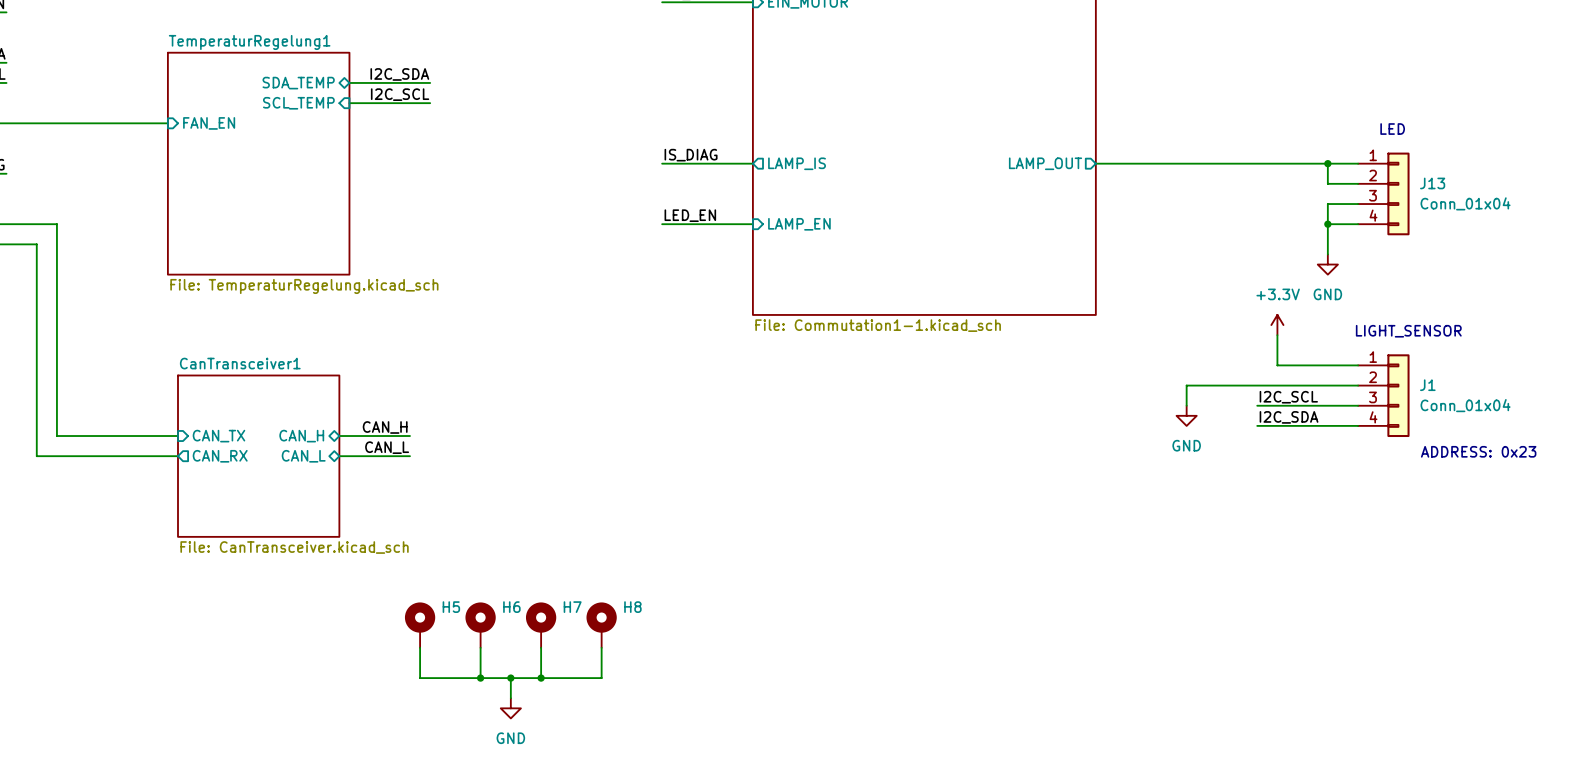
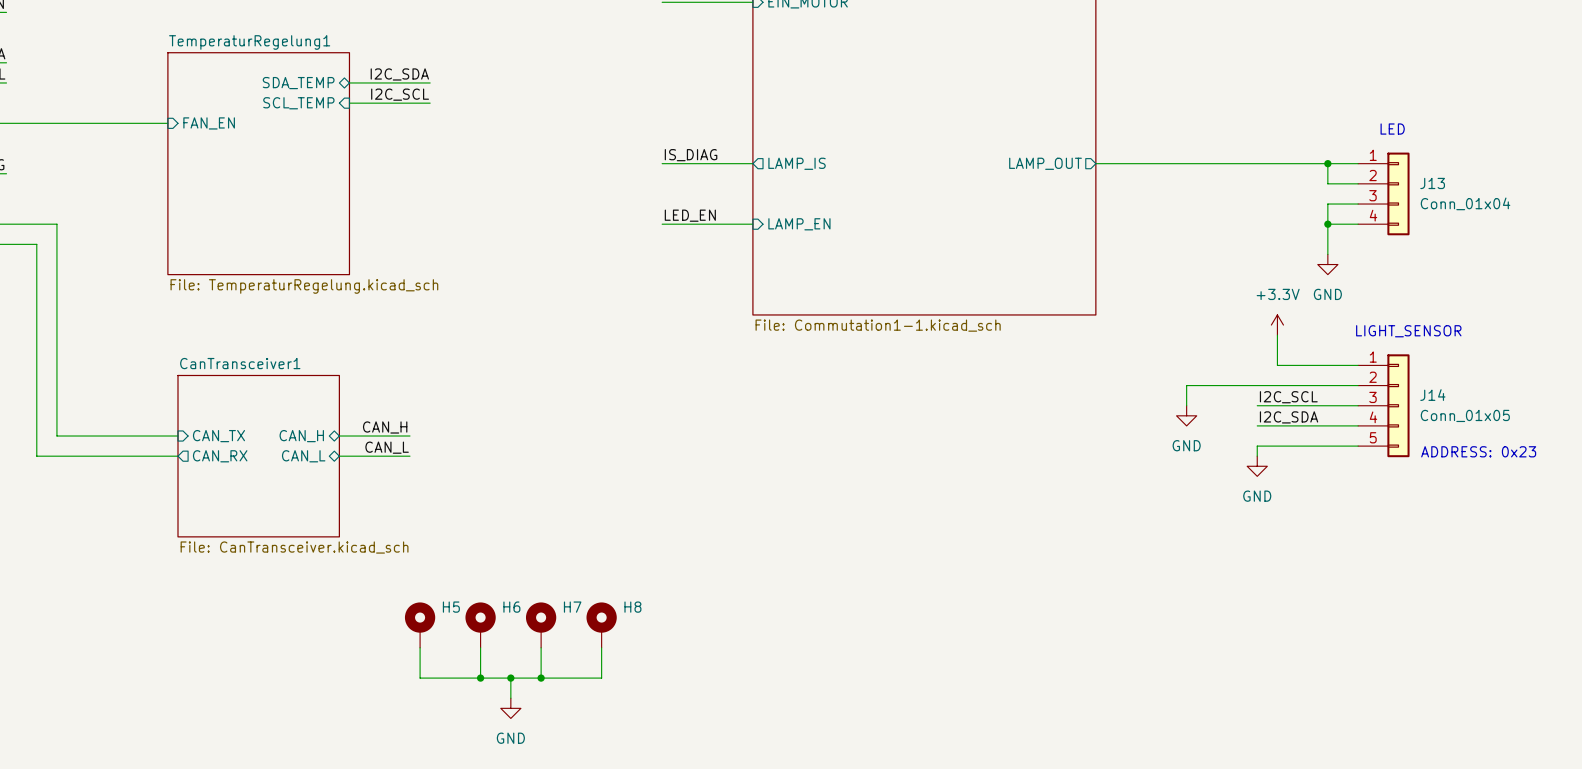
J1: Conn_01x04 (1383, 395) -> none
J14: none -> Conn_01x05 (1383, 405)
wire: none -> (1358, 446) (1257, 446) (1257, 456)
power symbol: none -> GND (1257, 466)

